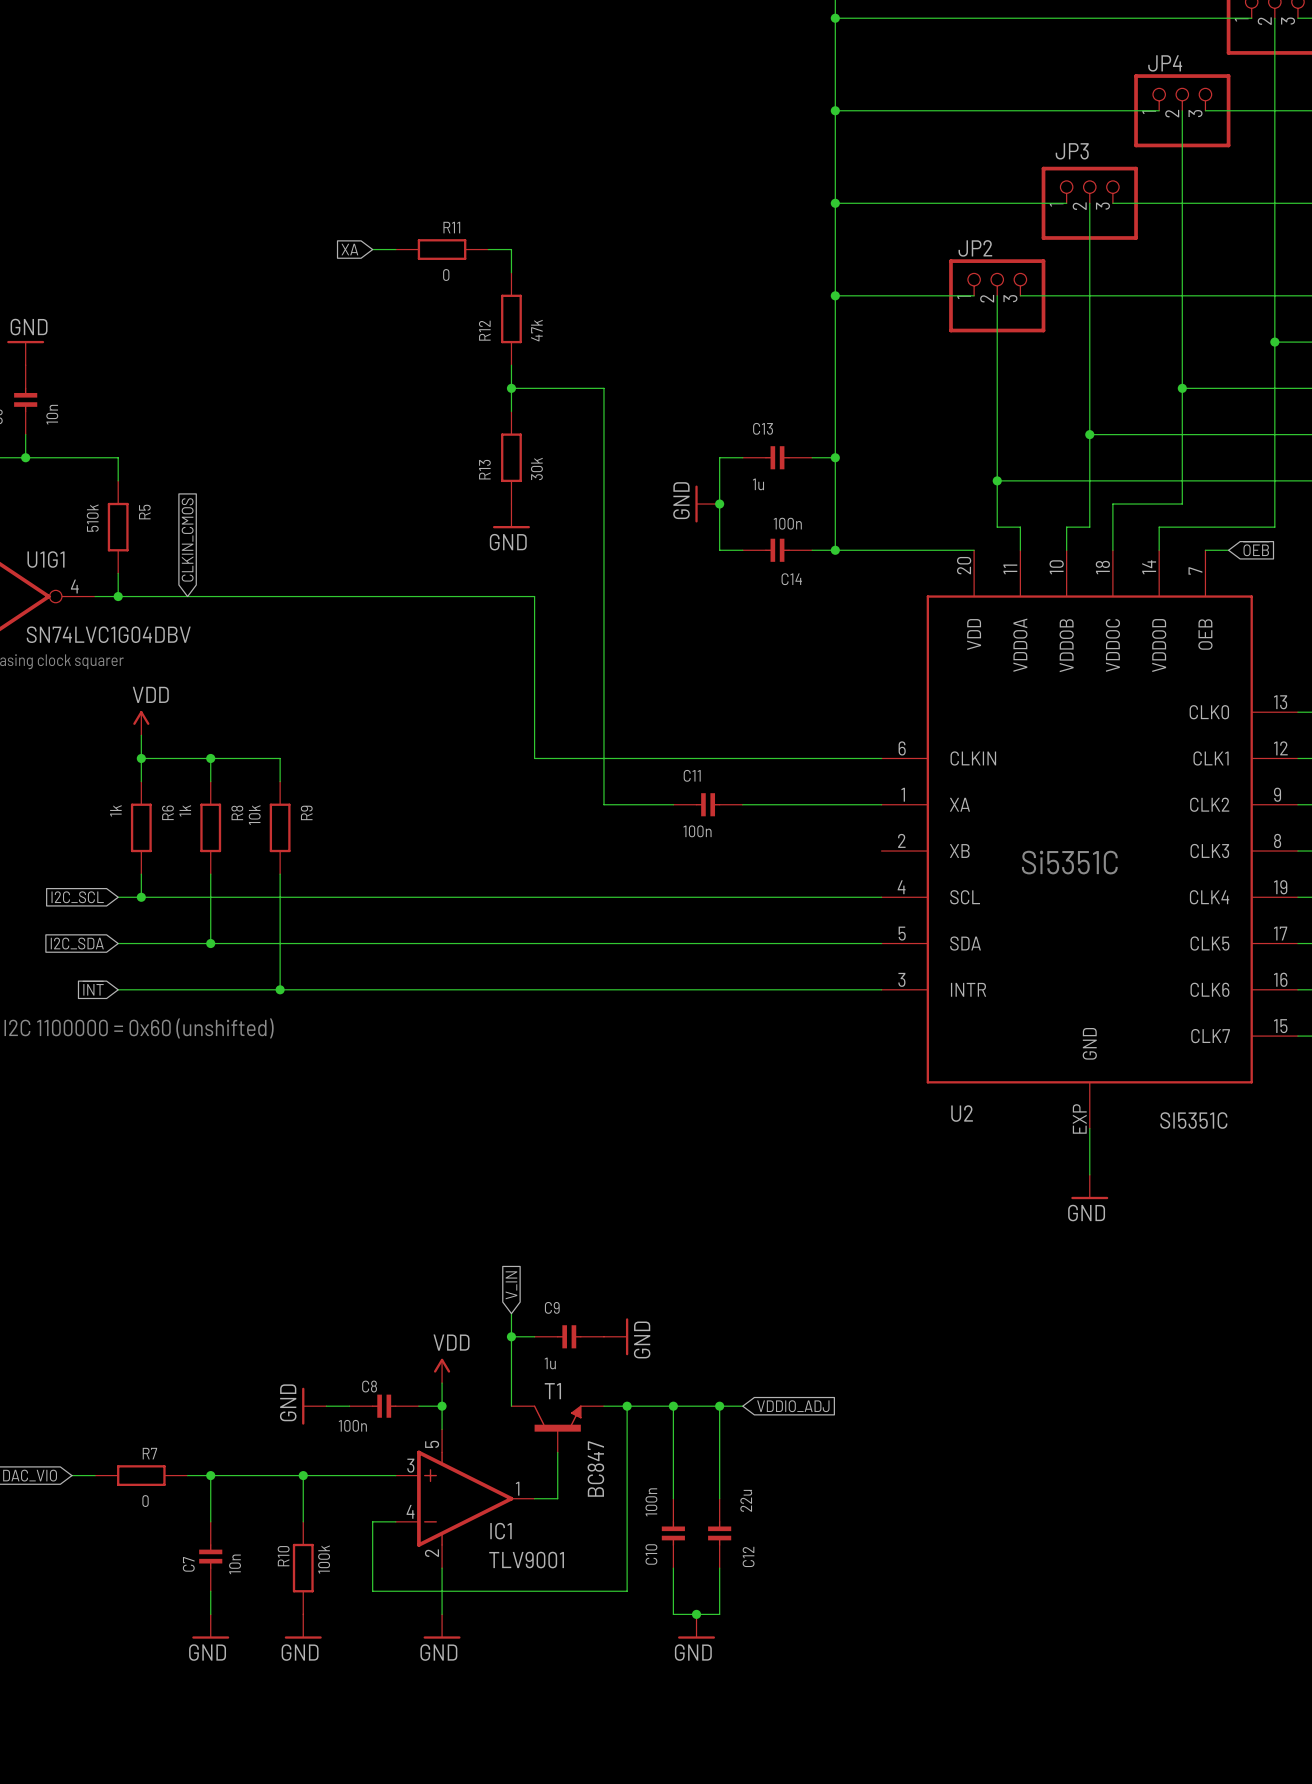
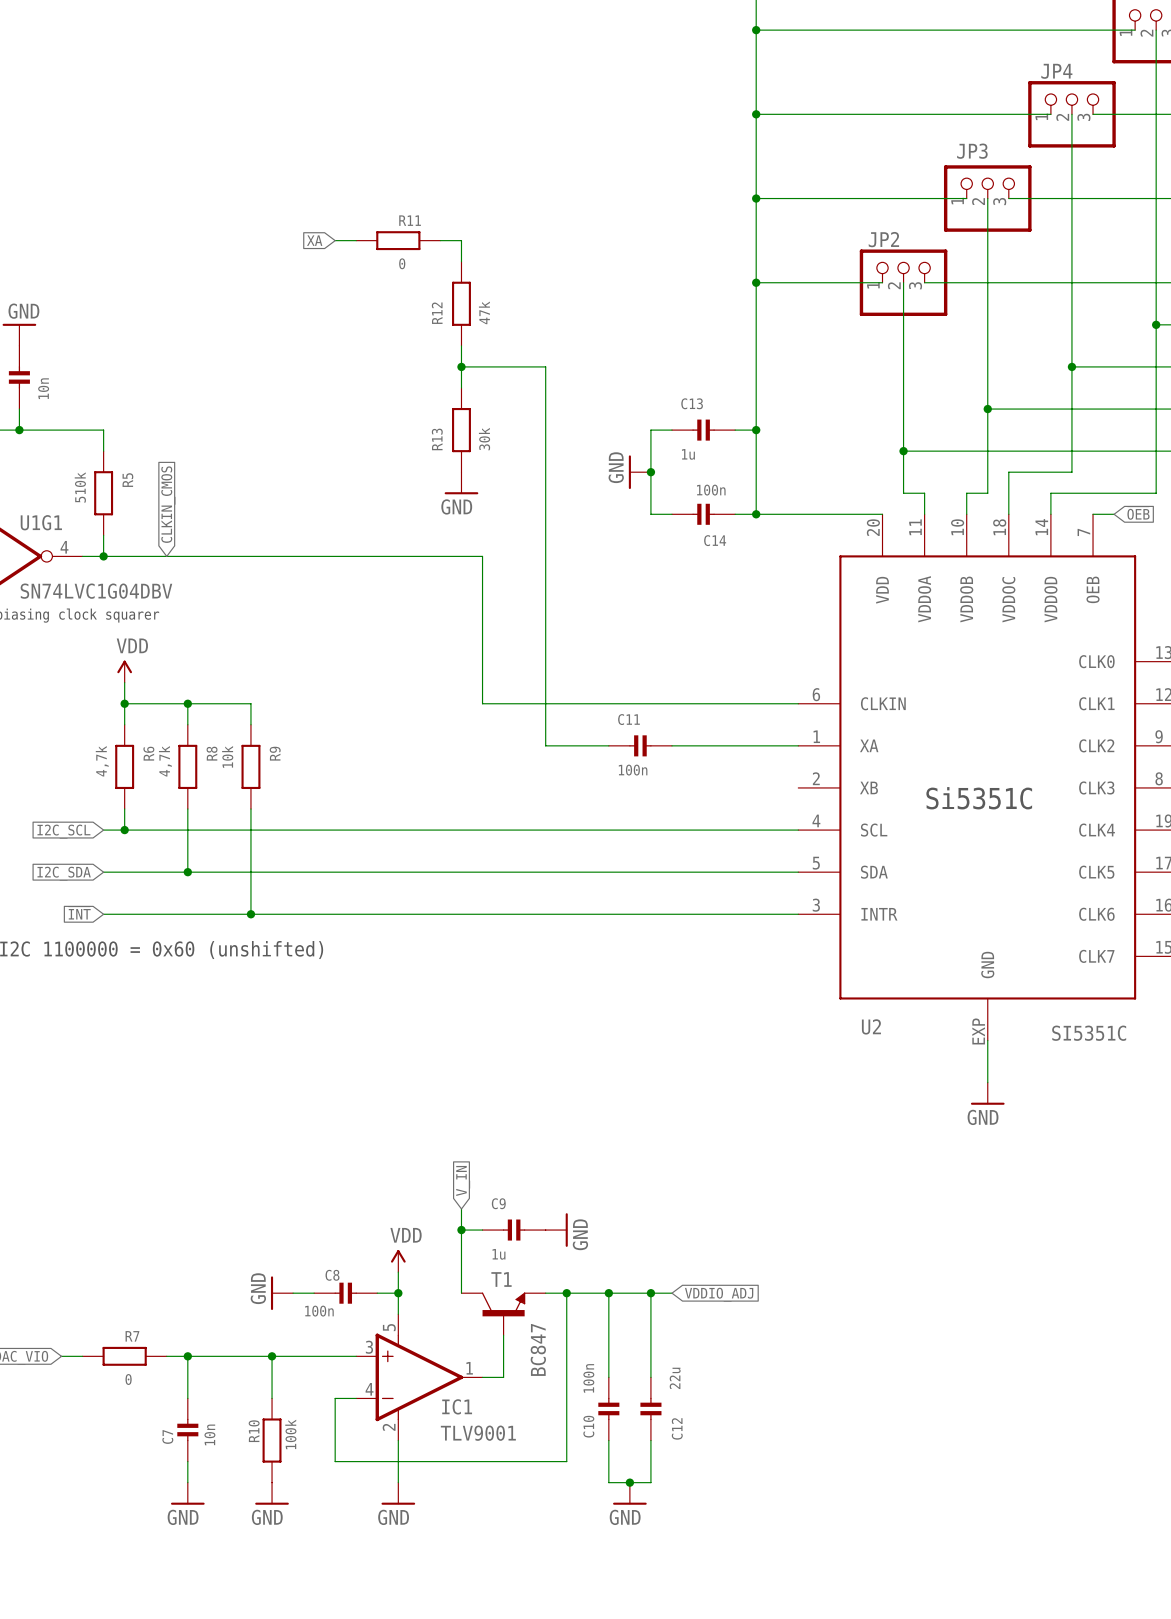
R6 value: 1k (115, 810) -> 4,7k (102, 761)
R8 value: 1k (185, 810) -> 4,7k (165, 761)

